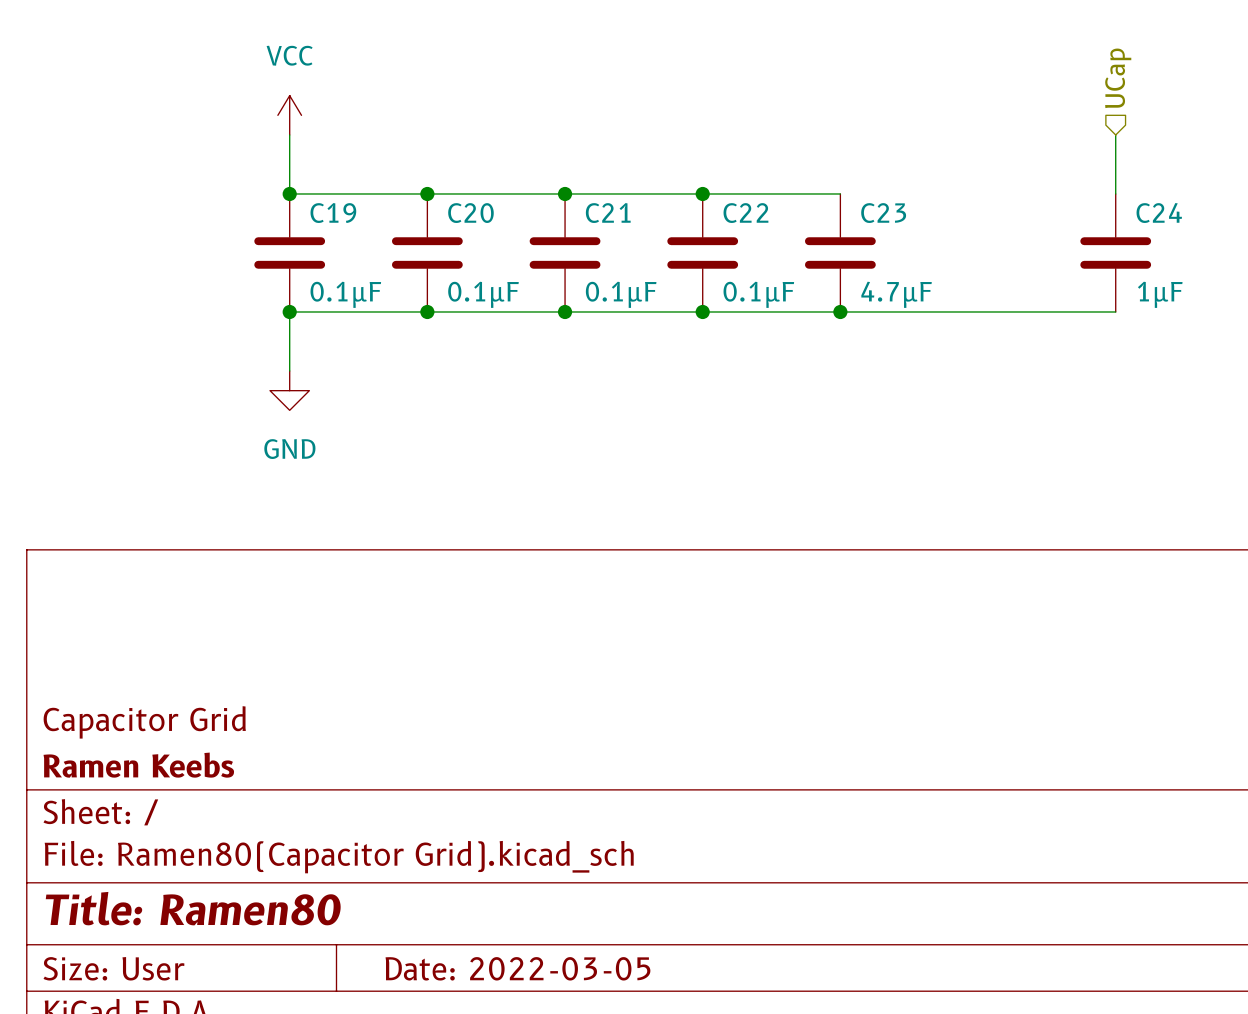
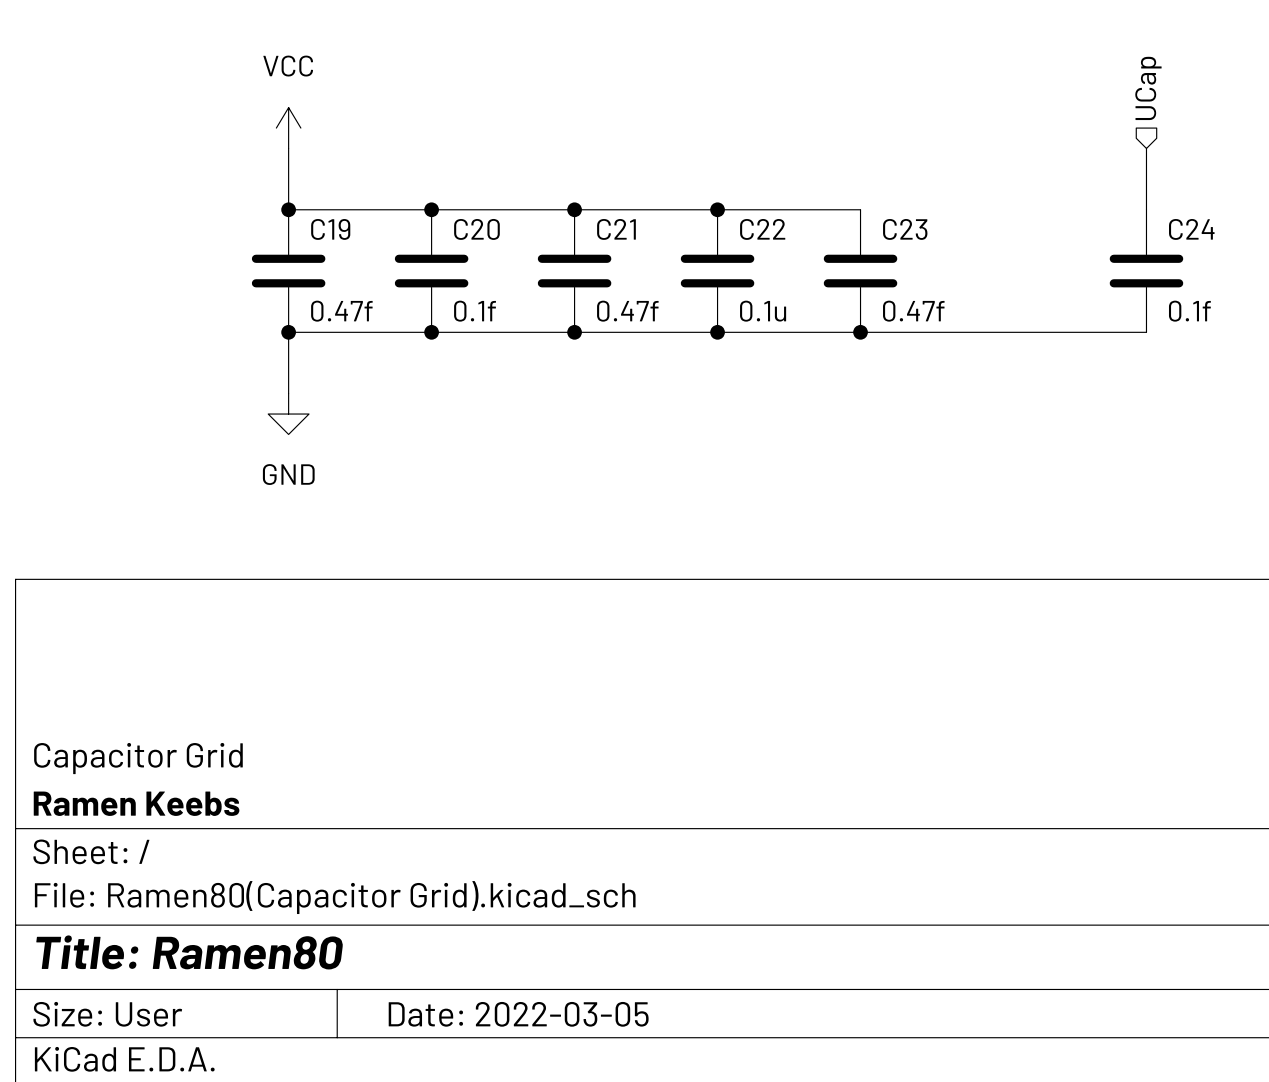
C19 value: 0.1µF (345, 294) -> 0.47f (341, 311)
C20 value: 0.1µF (483, 294) -> 0.1f (475, 311)
C21 value: 0.1µF (621, 294) -> 0.47f (627, 311)
C22 value: 0.1µF (758, 294) -> 0.1u (763, 311)
C23 value: 4.7µF (896, 294) -> 0.47f (913, 311)
C24 value: 1µF (1160, 294) -> 0.1f (1189, 311)

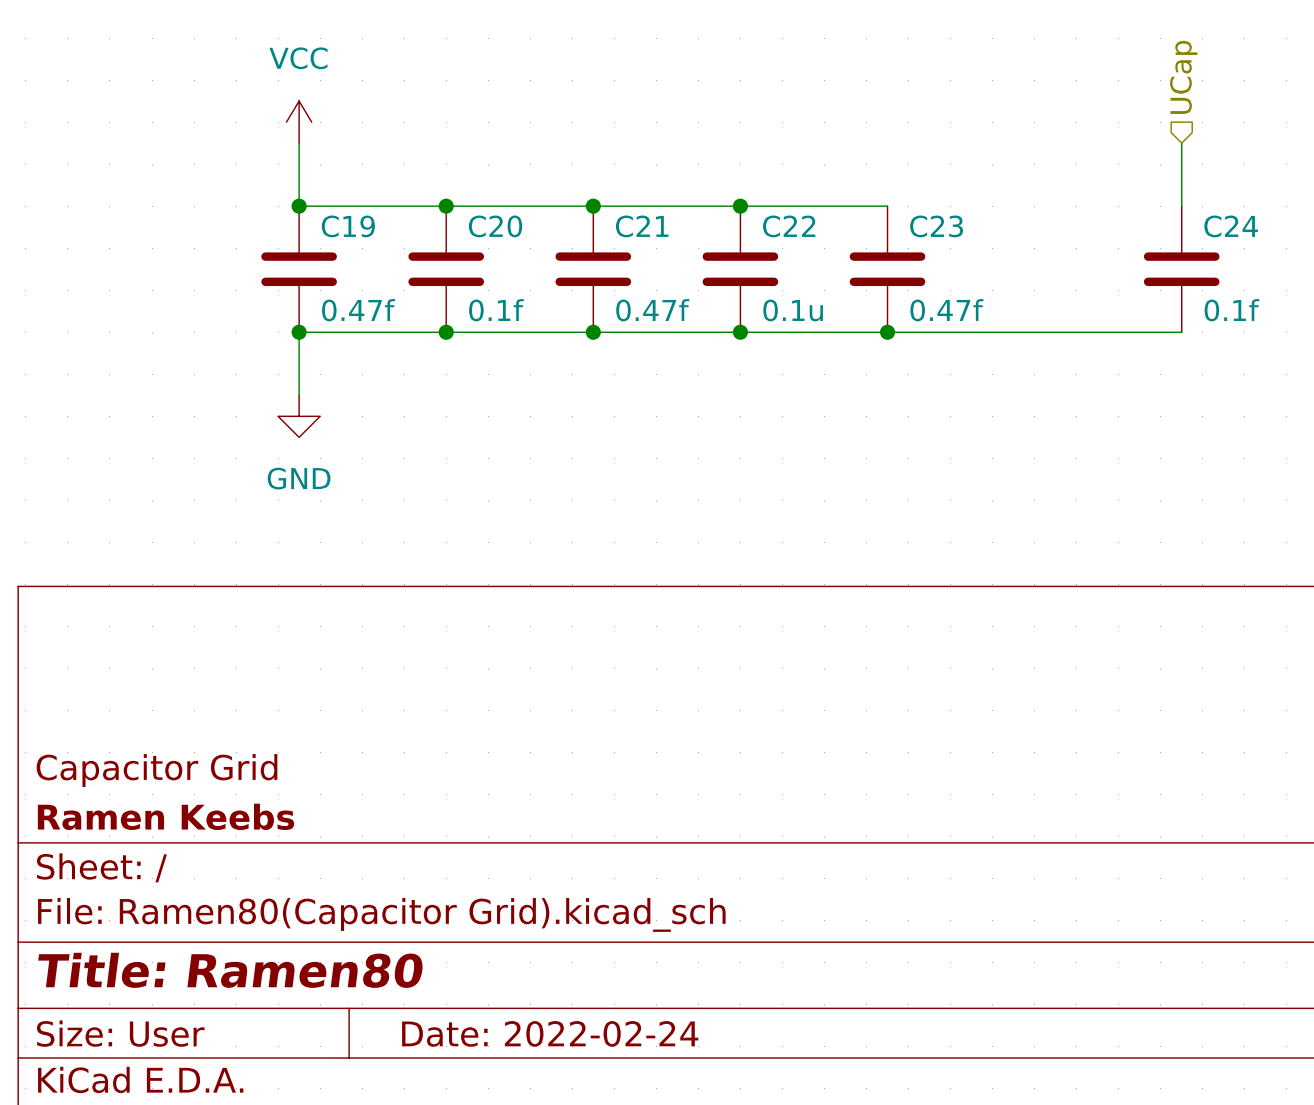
title block: Date: 2022-03-05 (518, 1014) -> Date: 2022-02-24 (550, 1033)

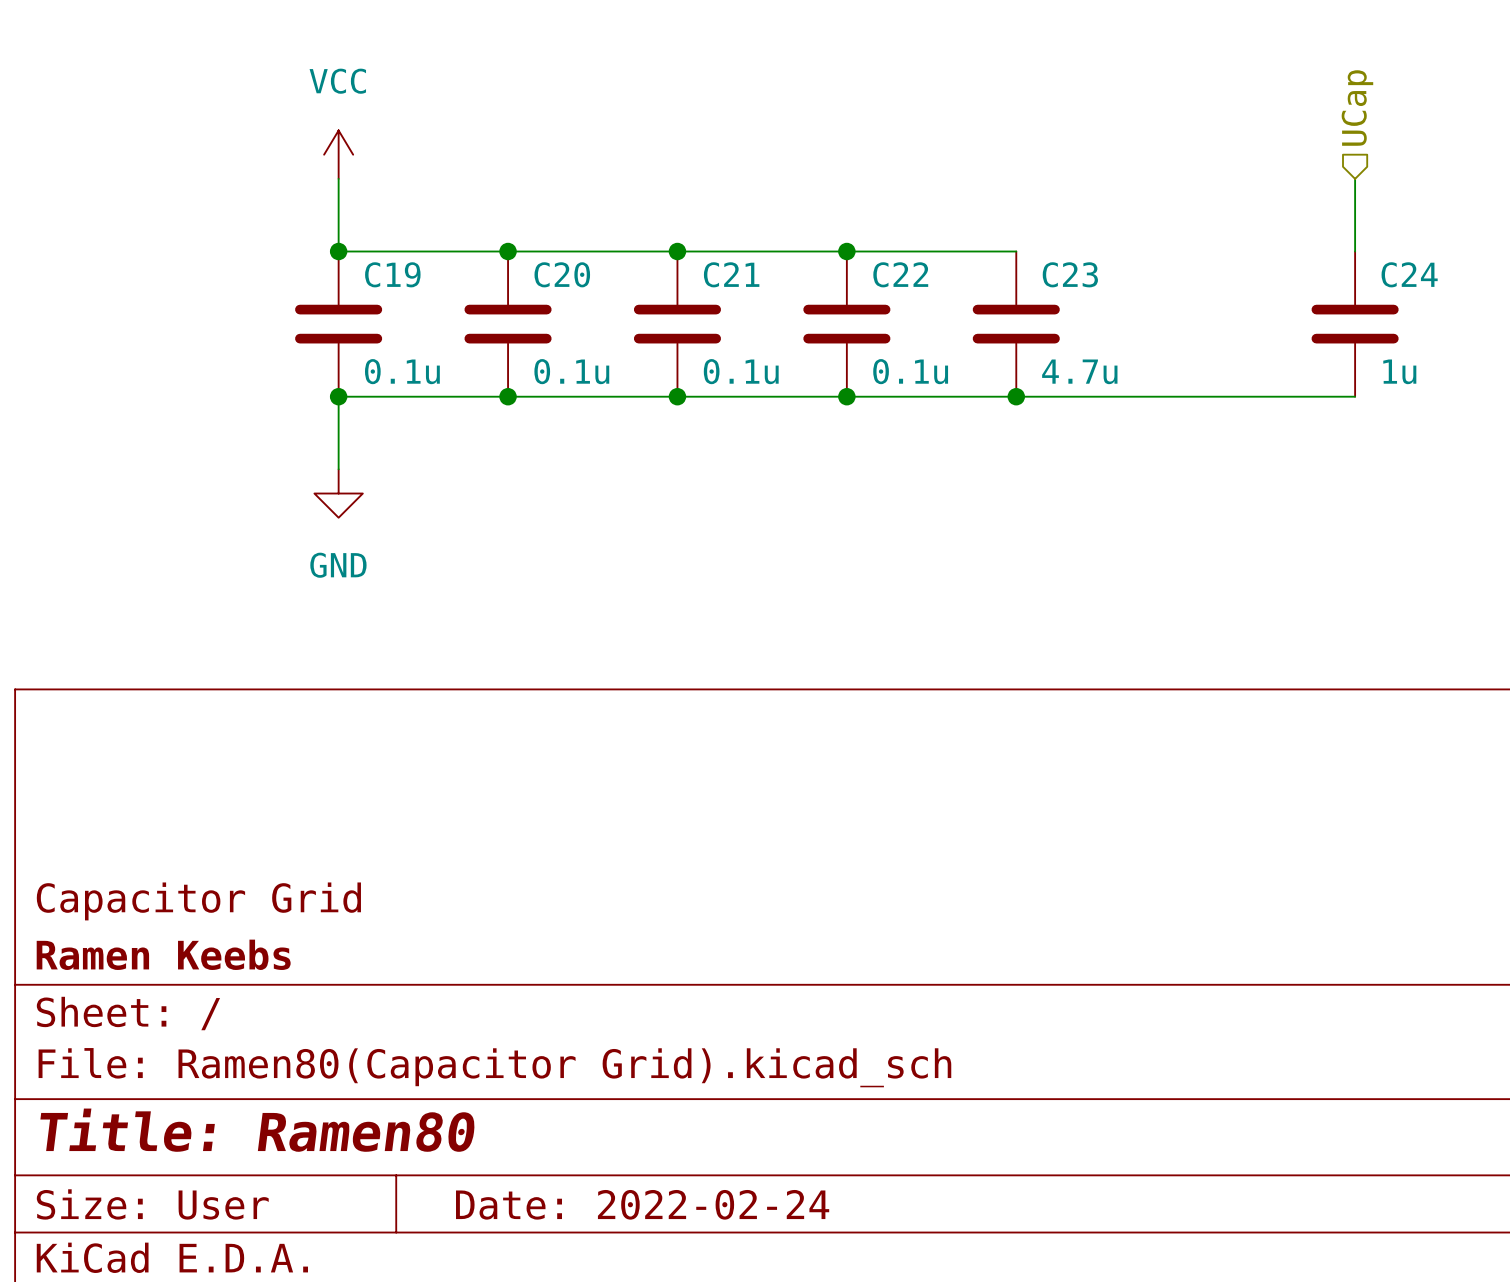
C19 value: 0.47f (358, 310) -> 0.1u (402, 371)
C20 value: 0.1f (496, 310) -> 0.1u (571, 371)
C21 value: 0.47f (652, 310) -> 0.1u (741, 371)
C23 value: 0.47f (946, 310) -> 4.7u (1079, 371)
C24 value: 0.1f (1231, 310) -> 1u (1399, 371)

